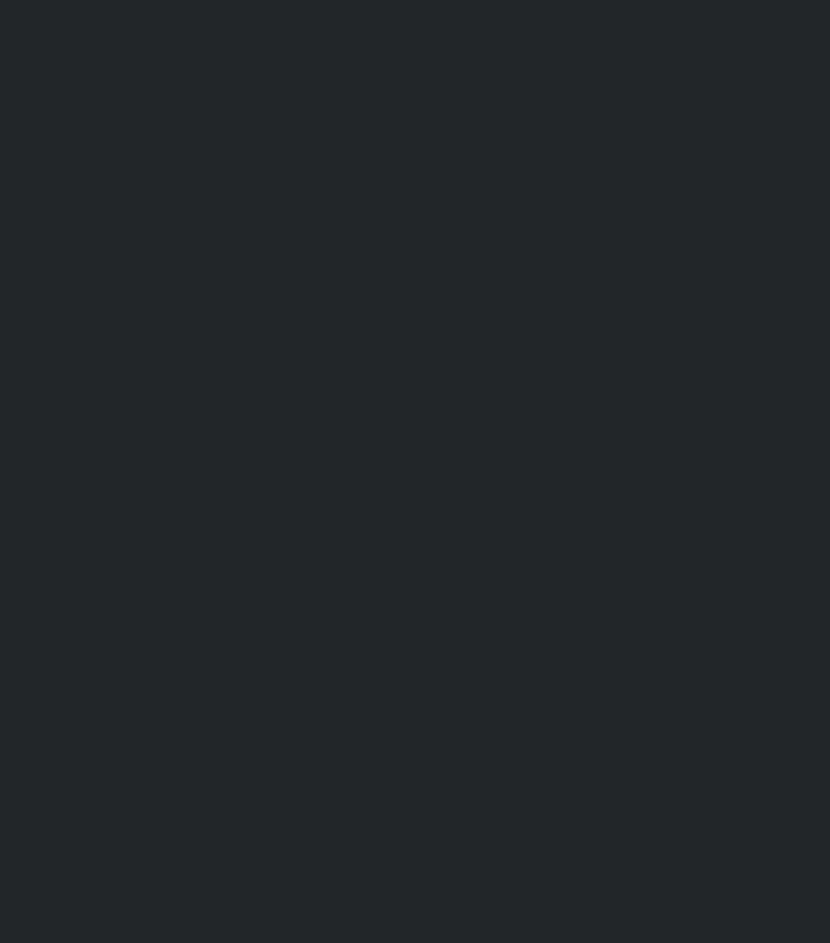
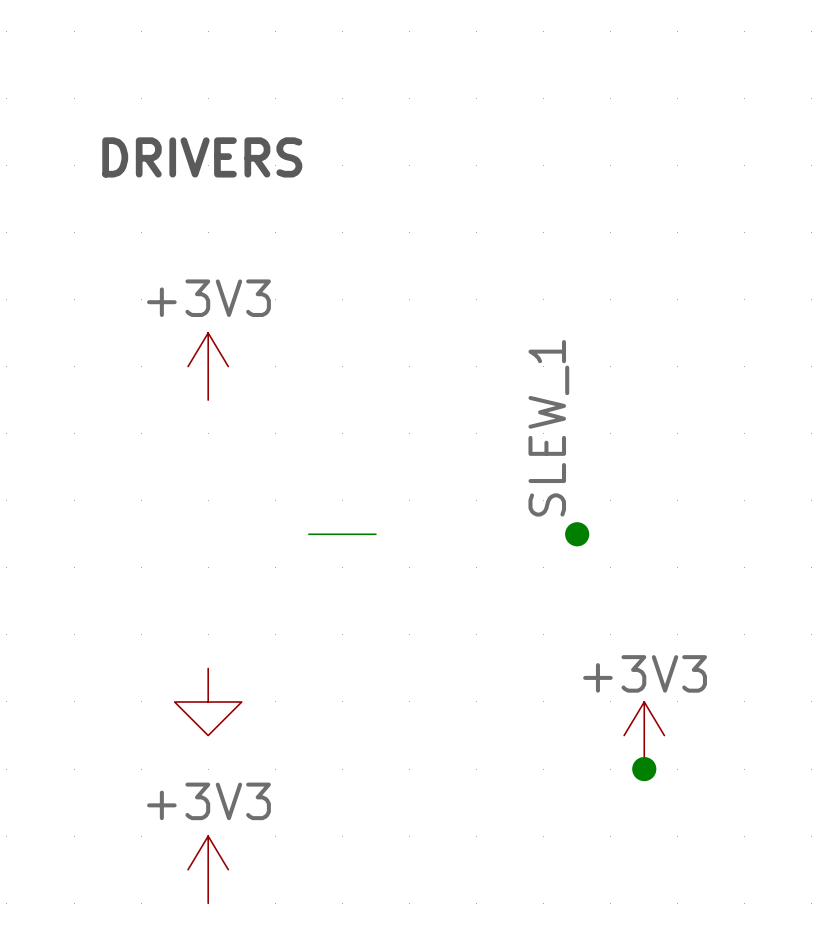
text: none -> DRIVERS (202, 157)
power symbol: none -> +3V3 (208, 366)
label: none -> SLEW_1 (548, 428)
wire: none -> (308, 534) (375, 534)
junction: none -> (577, 534)
power symbol: none -> (208, 701)
power symbol: none -> +3V3 (644, 735)
junction: none -> (644, 769)
power symbol: none -> +3V3 (208, 869)

